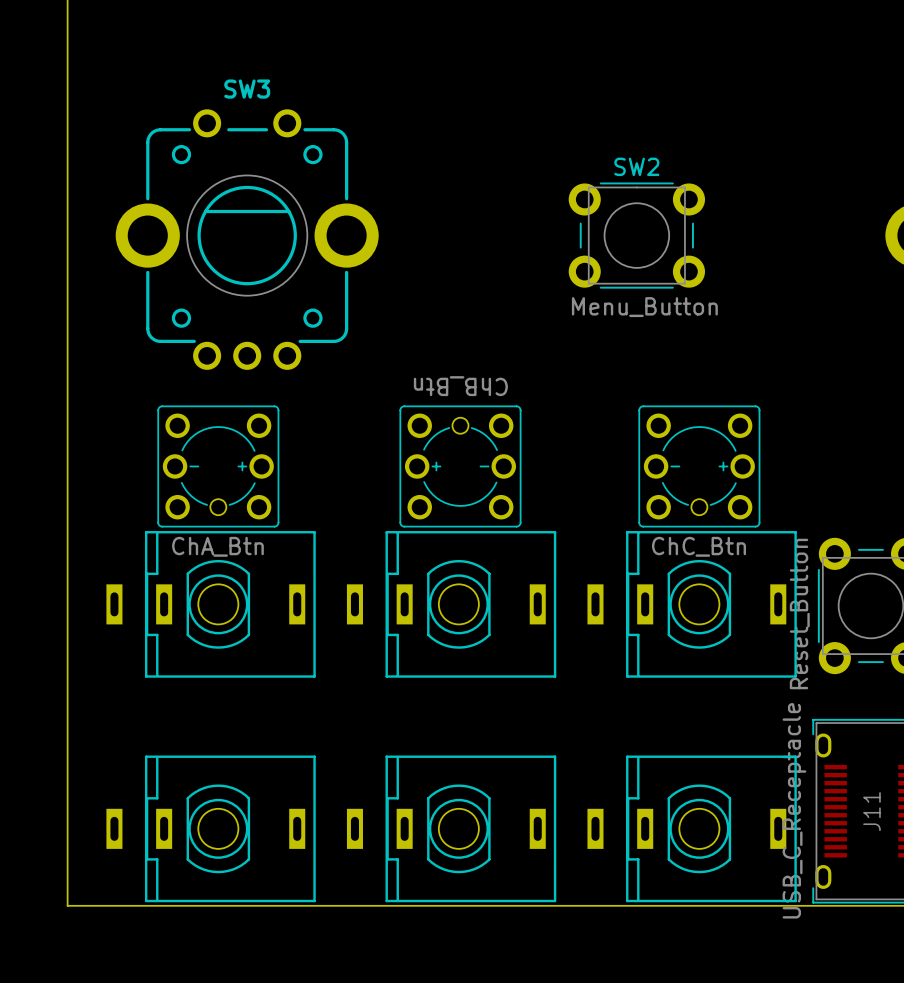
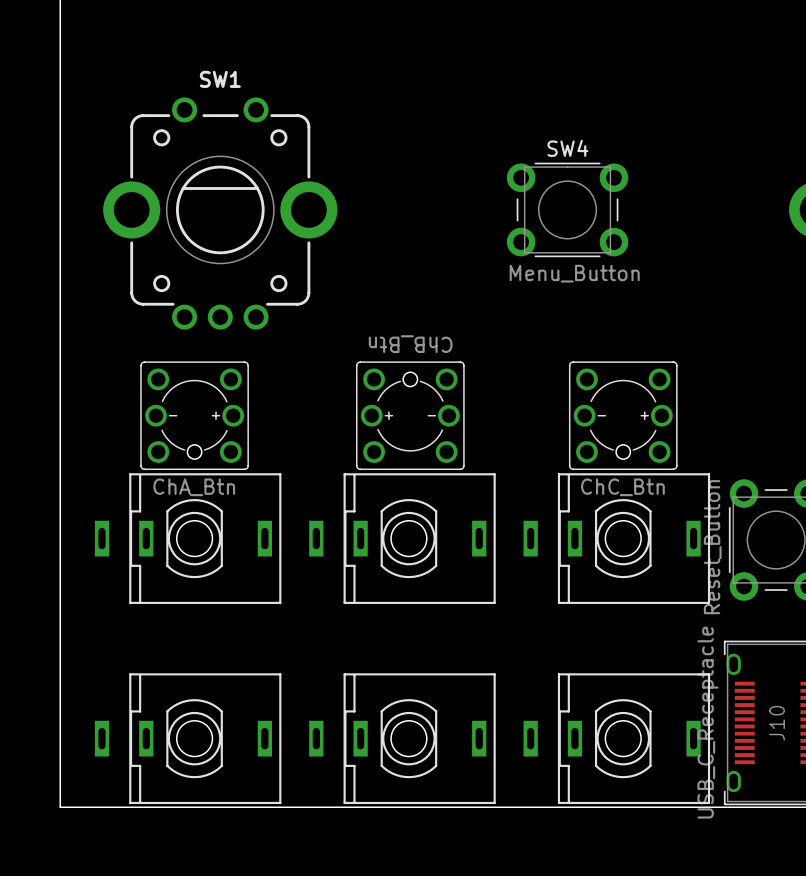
SW3 name: SW3 (247, 89) -> SW1 (220, 79)
SW2 name: SW2 (636, 166) -> SW4 (567, 148)
J11 name: J11 (871, 811) -> J10 (777, 723)

